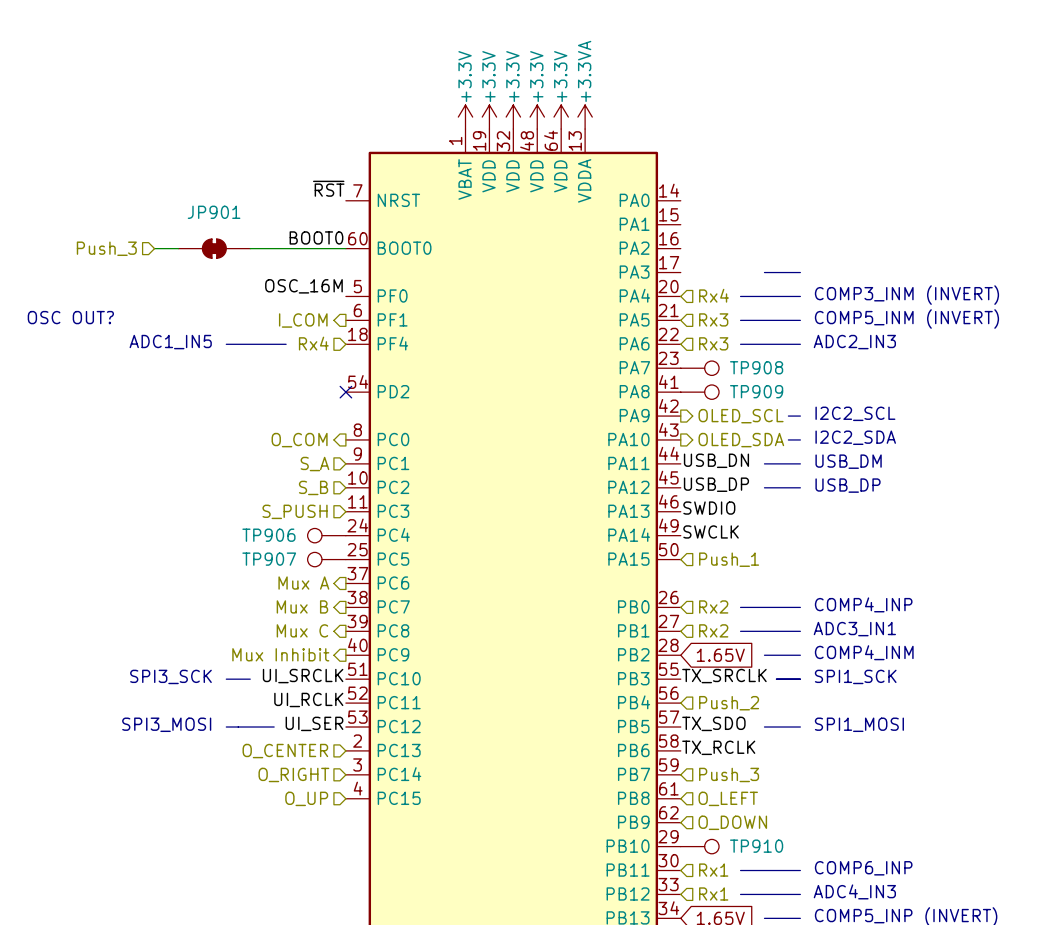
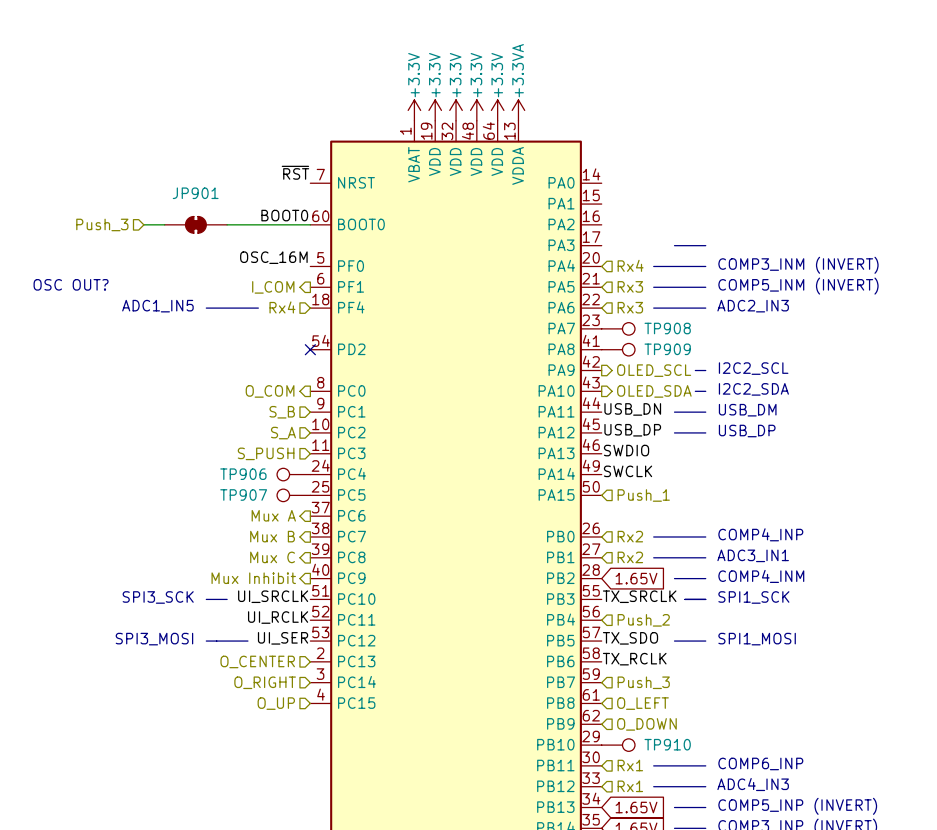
hierarchical label: S_A (314, 464) -> S_B (282, 412)
hierarchical label: S_B (313, 487) -> S_A (283, 433)

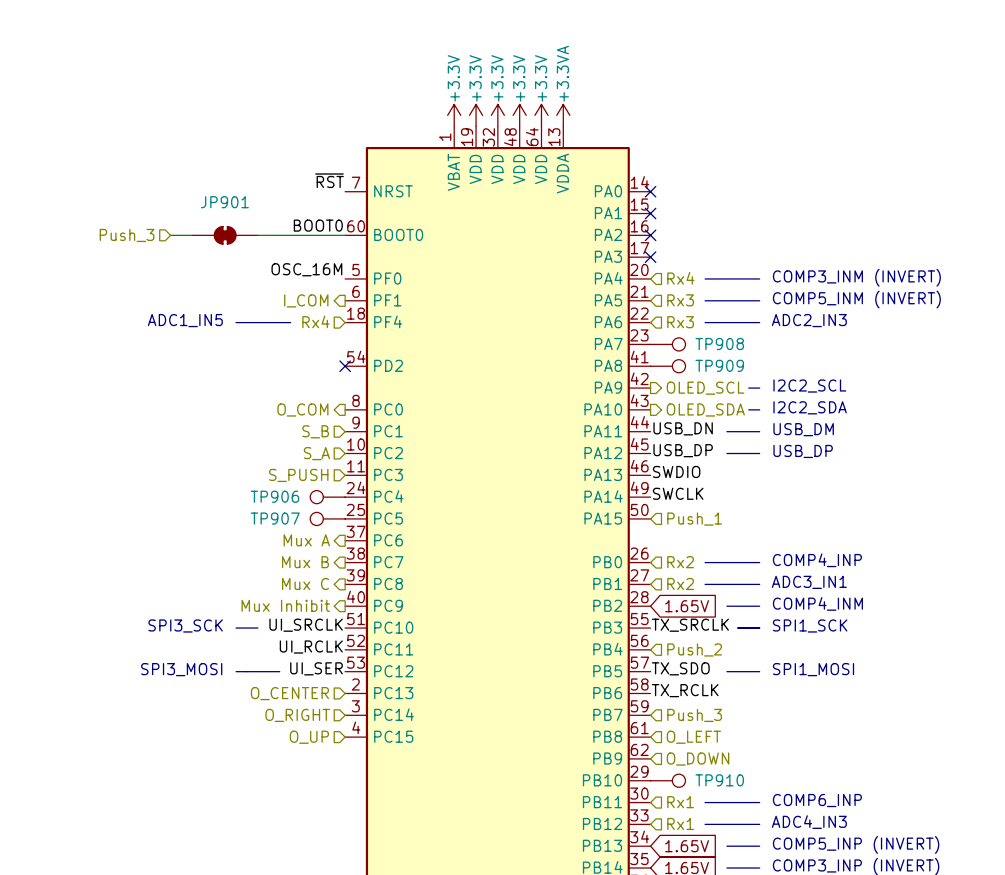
no-connect mark: none -> (650, 191)
no-connect mark: none -> (650, 213)
no-connect mark: none -> (650, 235)
no-connect mark: none -> (650, 257)
line: (674, 245) (705, 245) -> none
text: OSC OUT? (71, 284) -> none

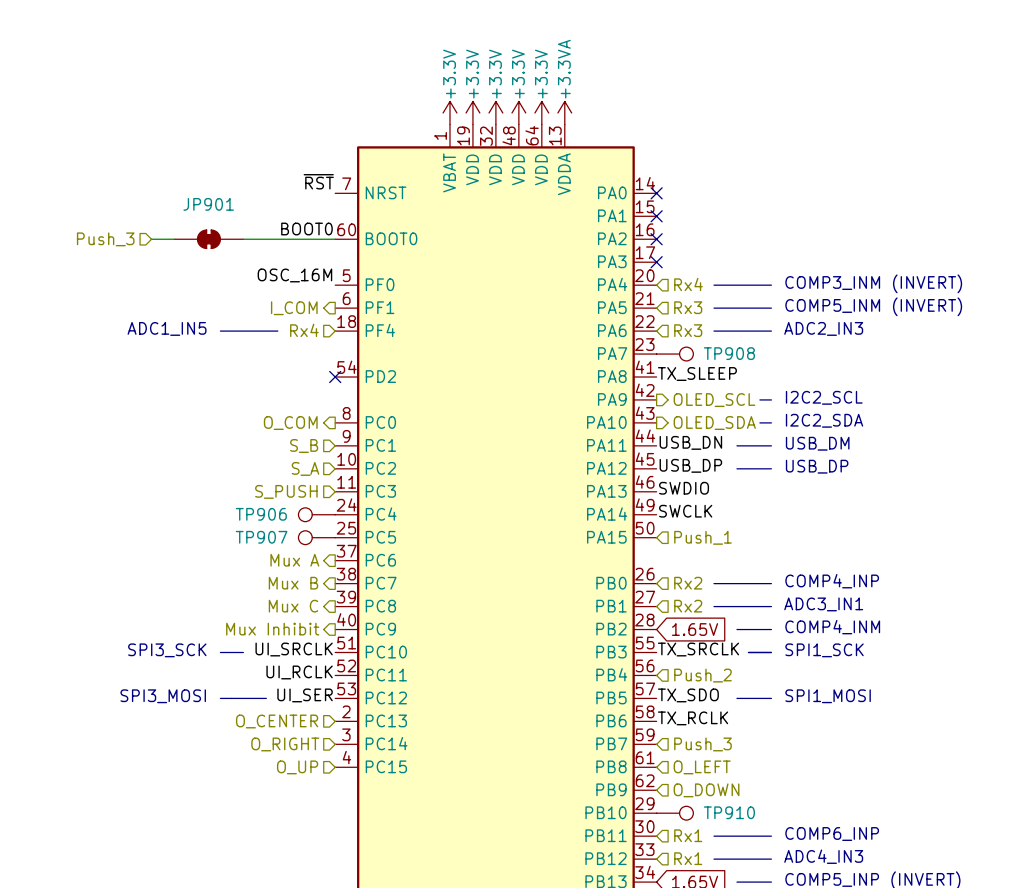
label: none -> TX_SLEEP (697, 374)
TP909: (668, 366) -> none

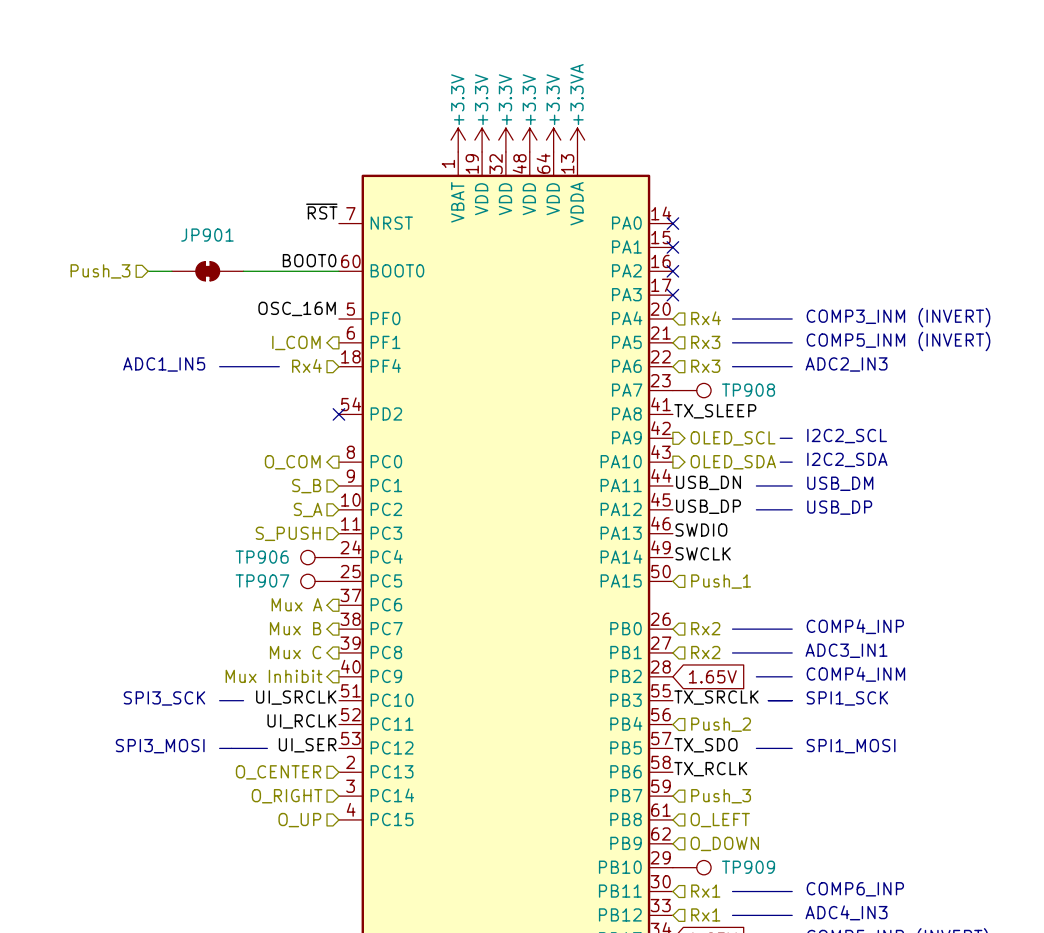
TP910 name: TP910 (729, 812) -> TP909 (748, 867)

